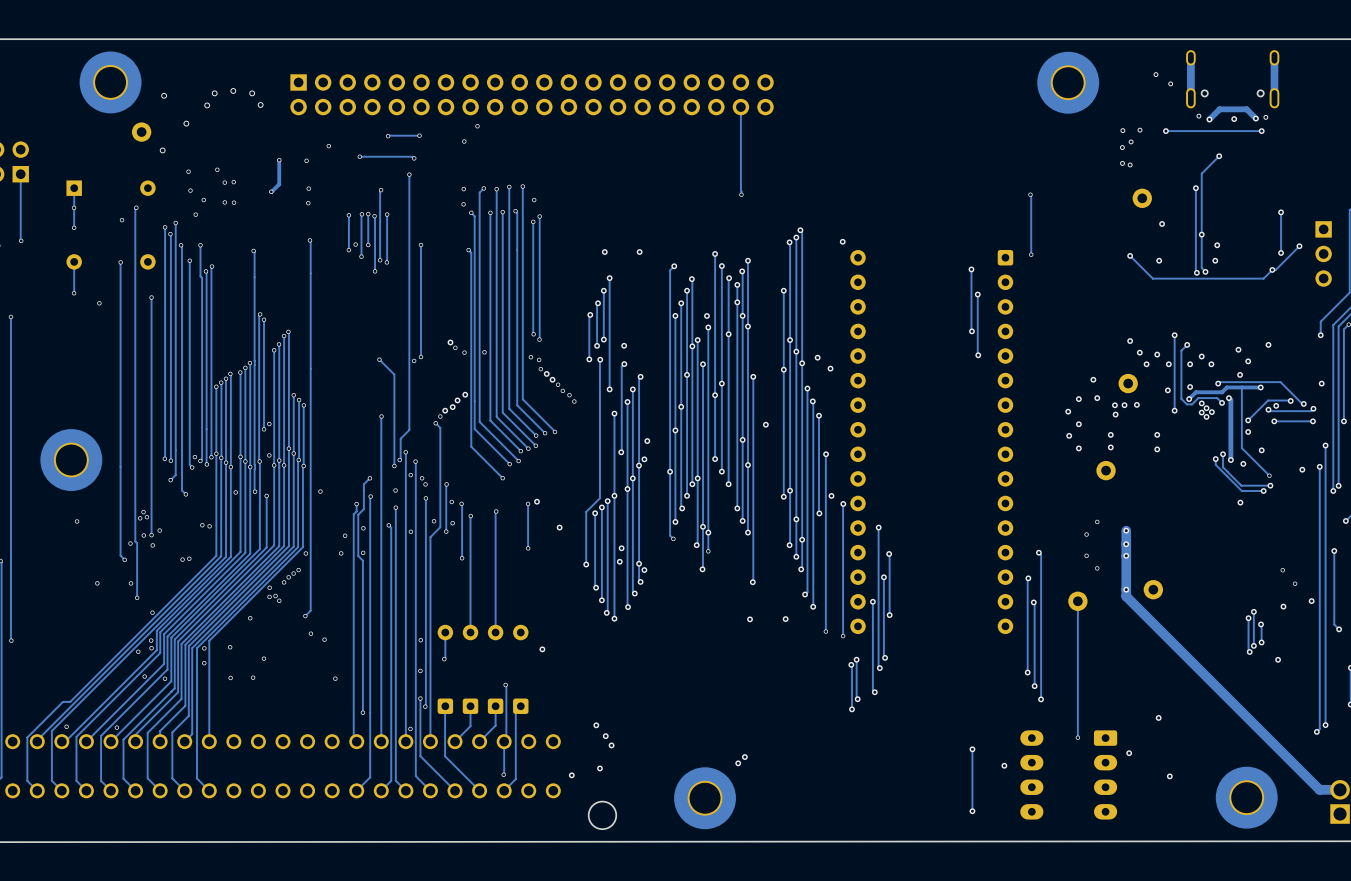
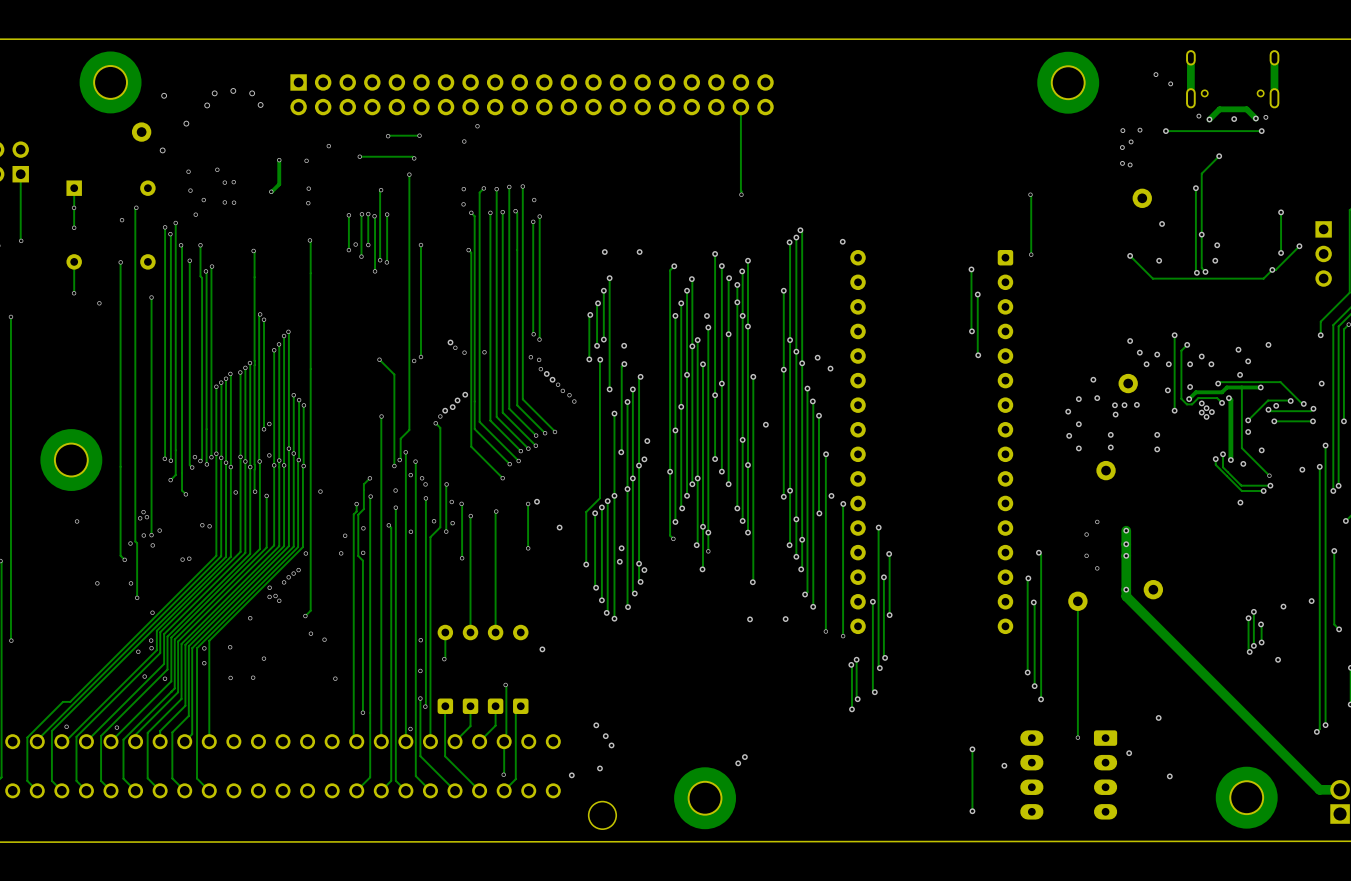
via: (1282, 570) -> none
via: (1295, 583) -> none

